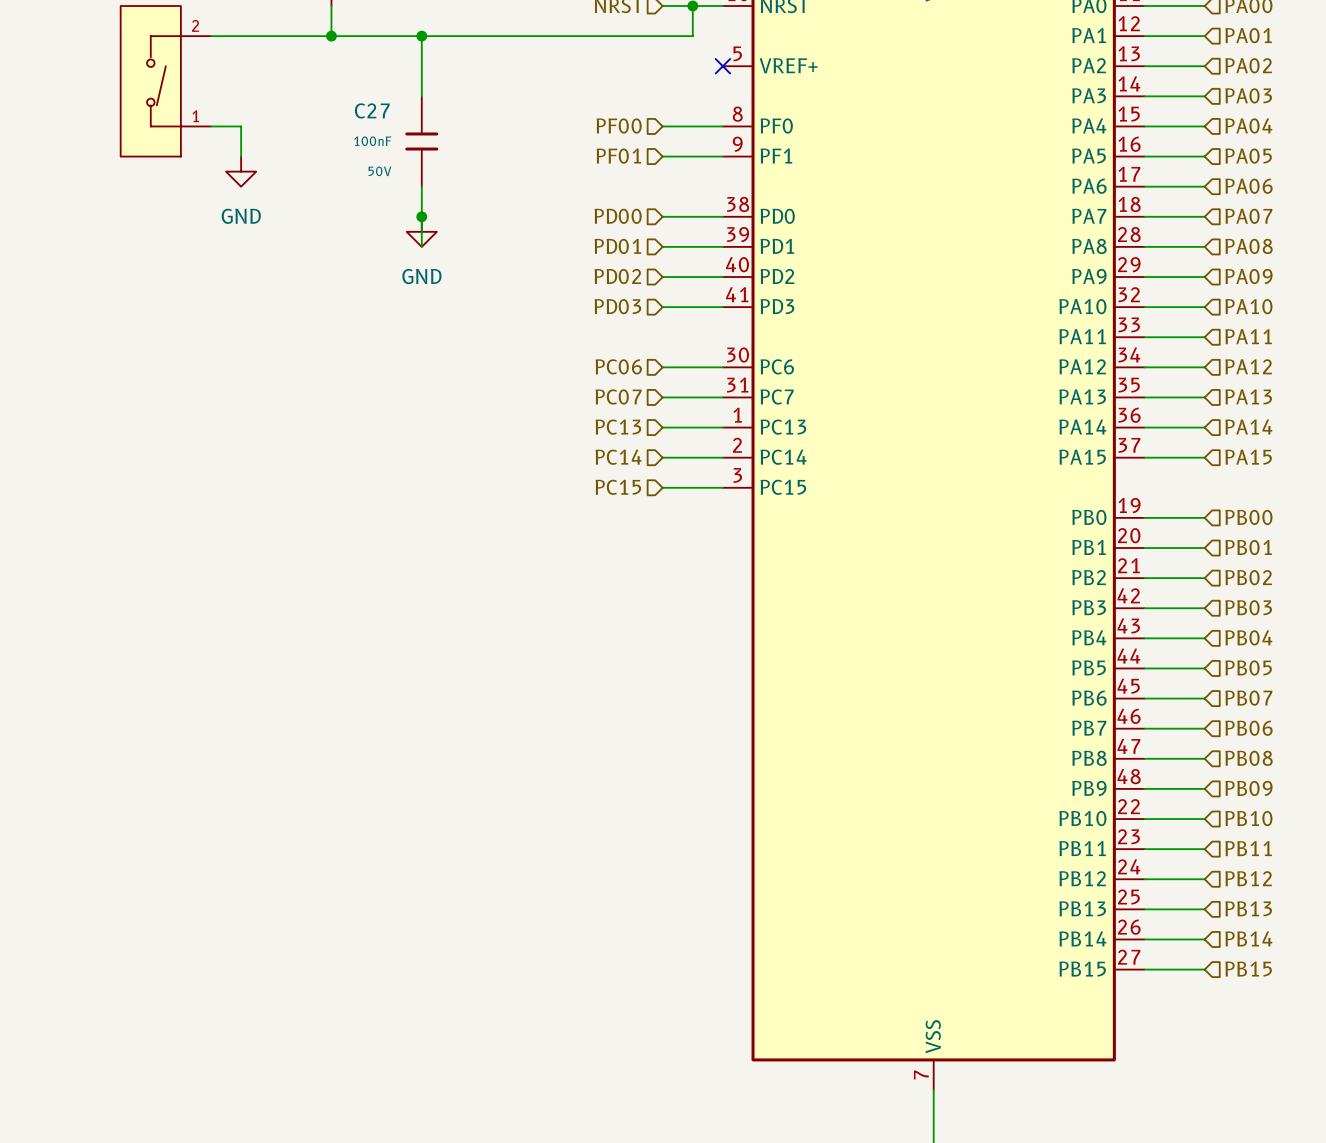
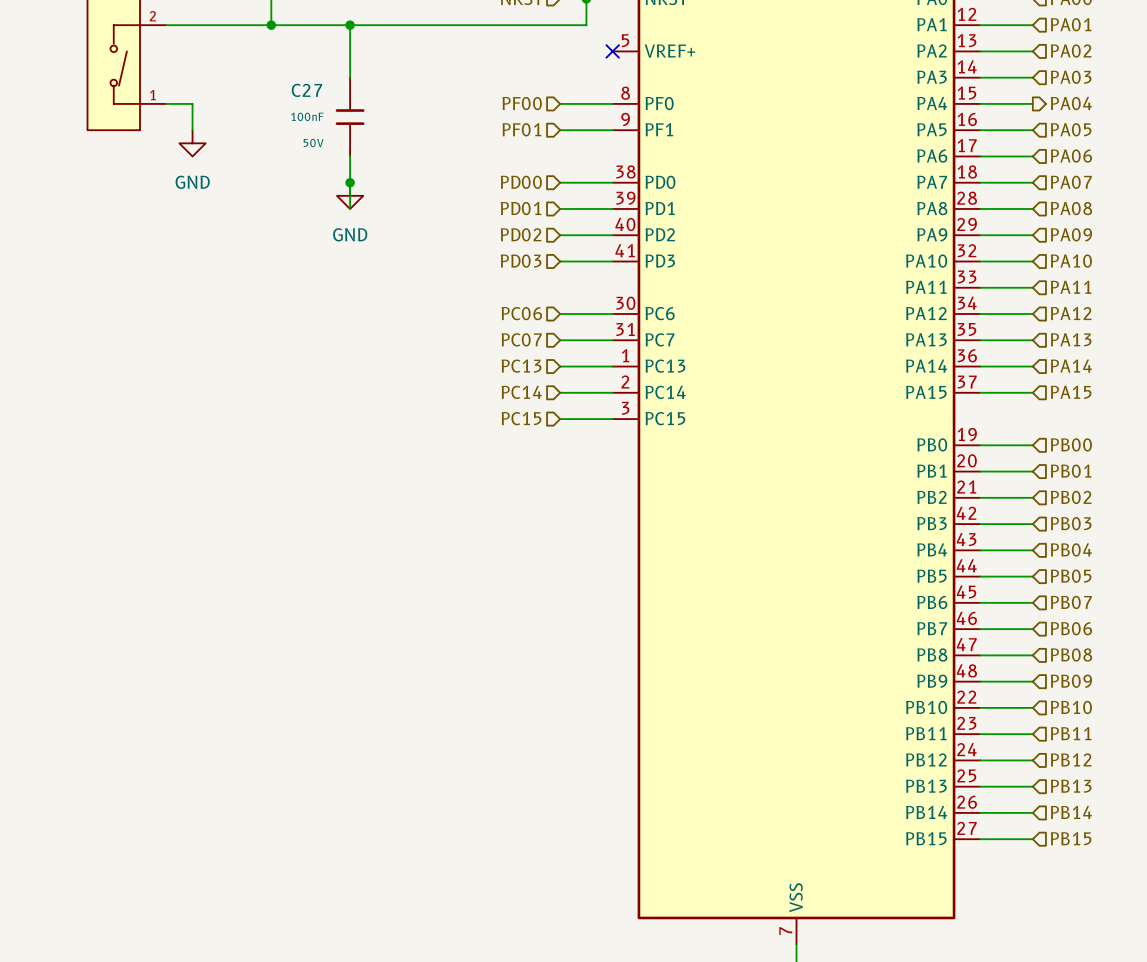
hierarchical label shape: input (1248, 125) -> output (1071, 103)

